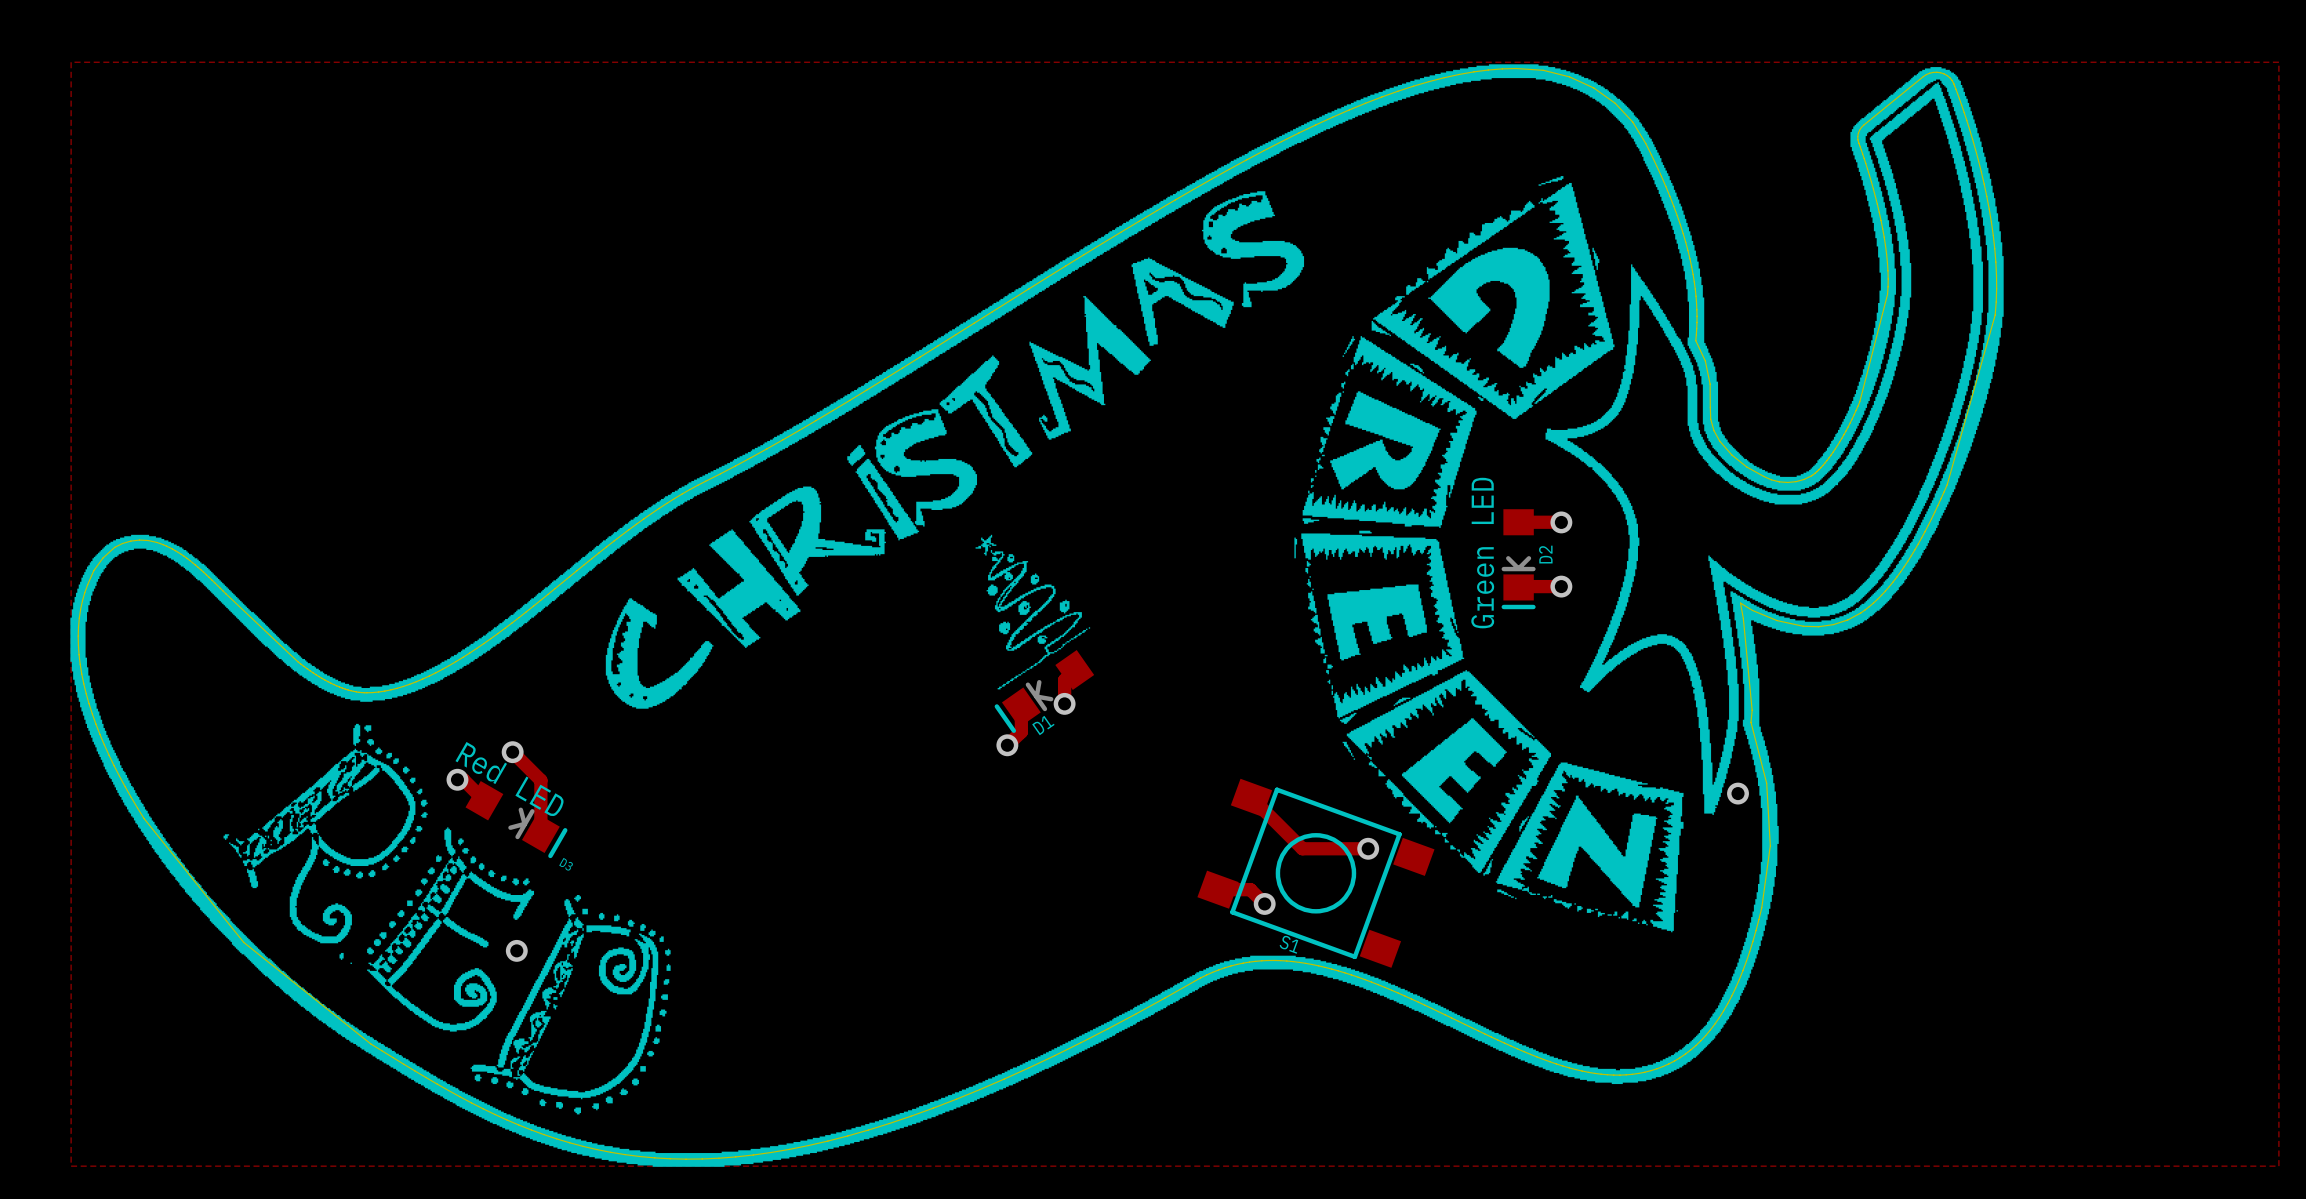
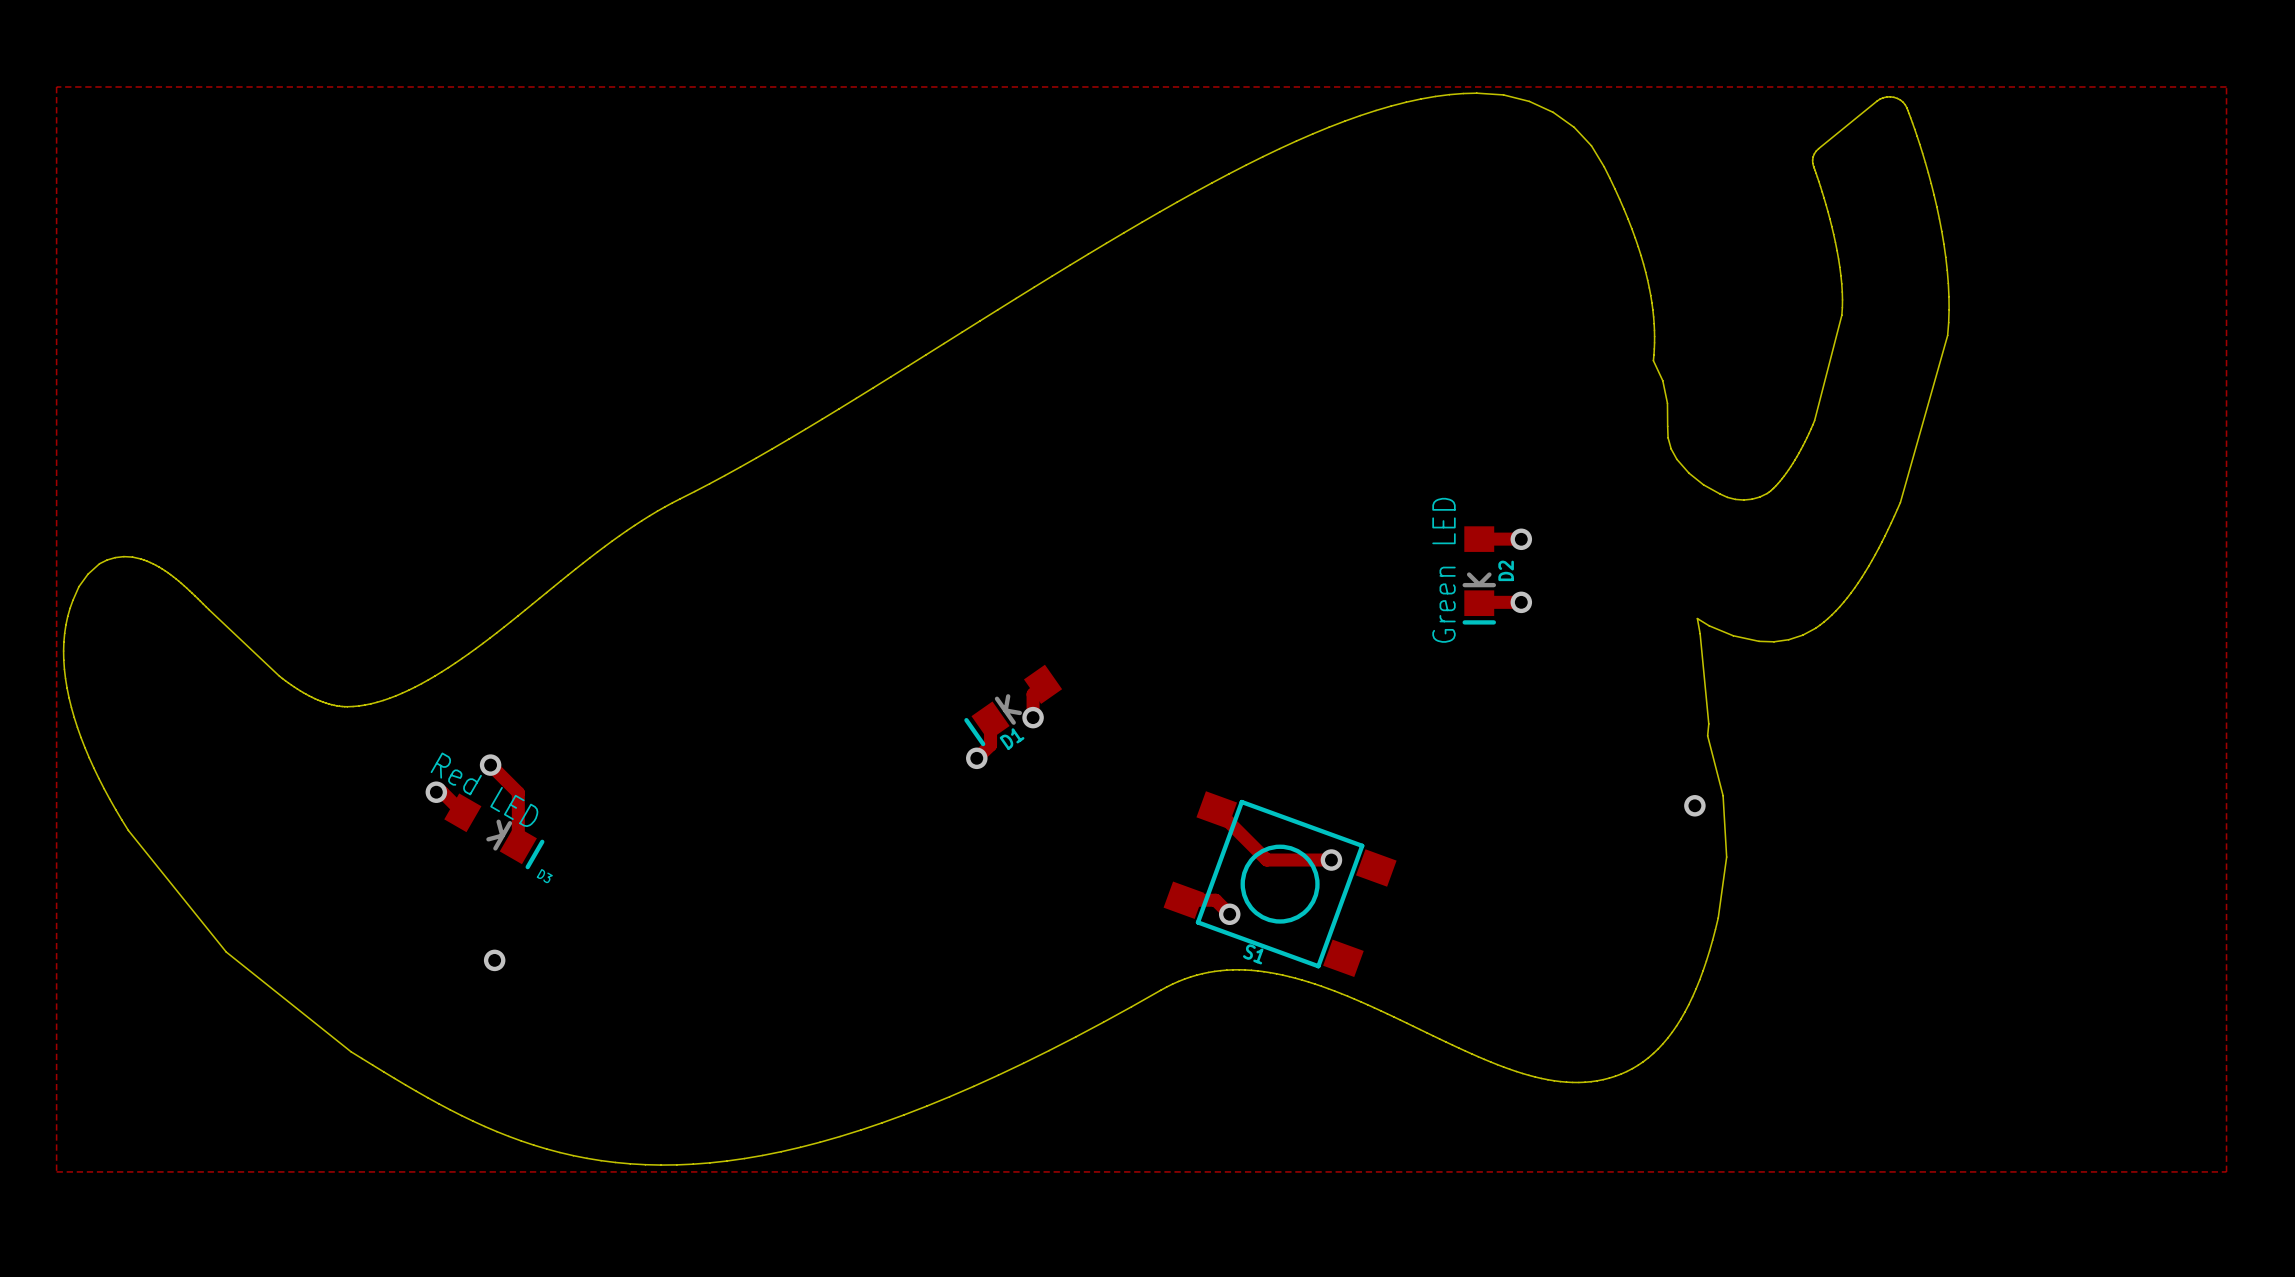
drawing: [70, 64, 2004, 1167] -> none
drawing: [975, 534, 1091, 690] -> none

